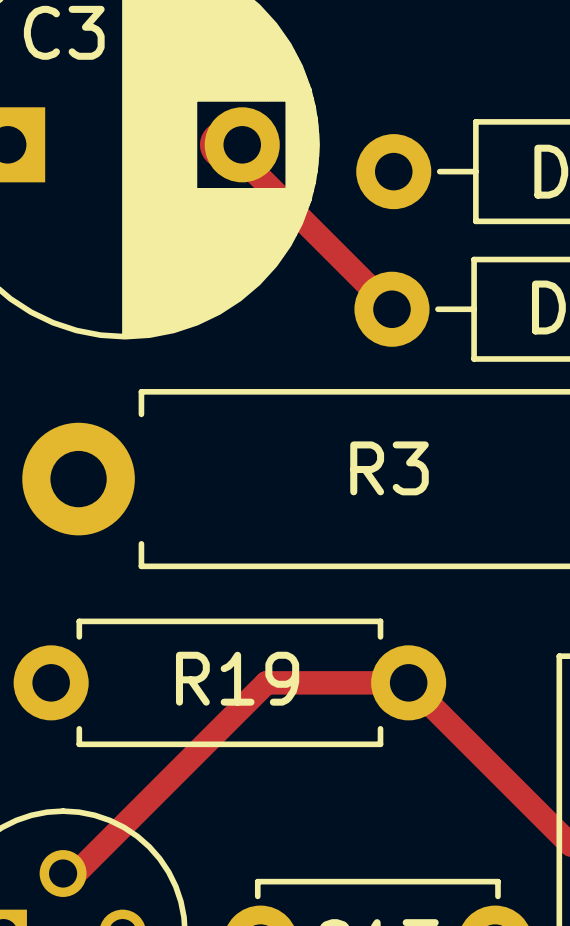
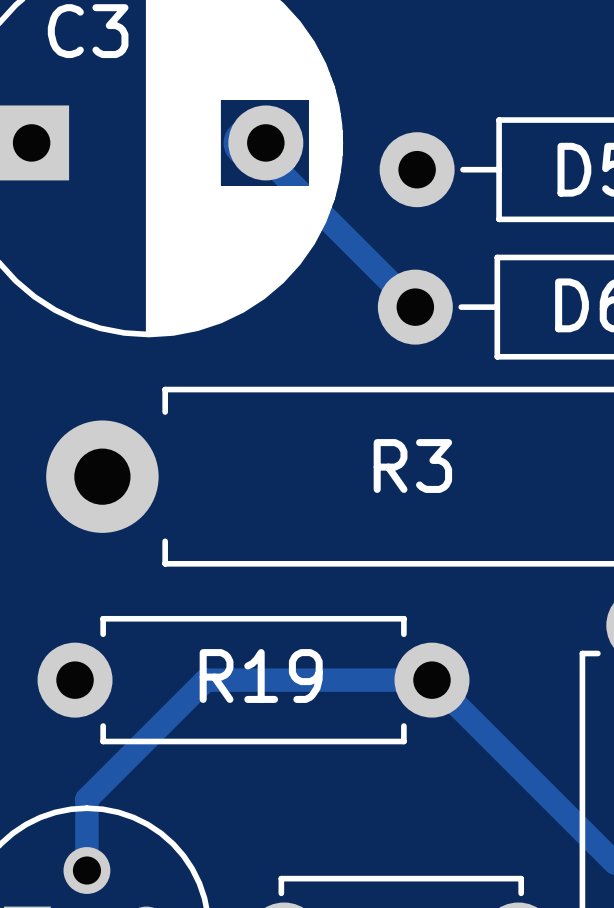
track: (266, 682) (75, 873) (63, 873) -> (289, 680) (205, 680) (86, 799) (86, 870)

